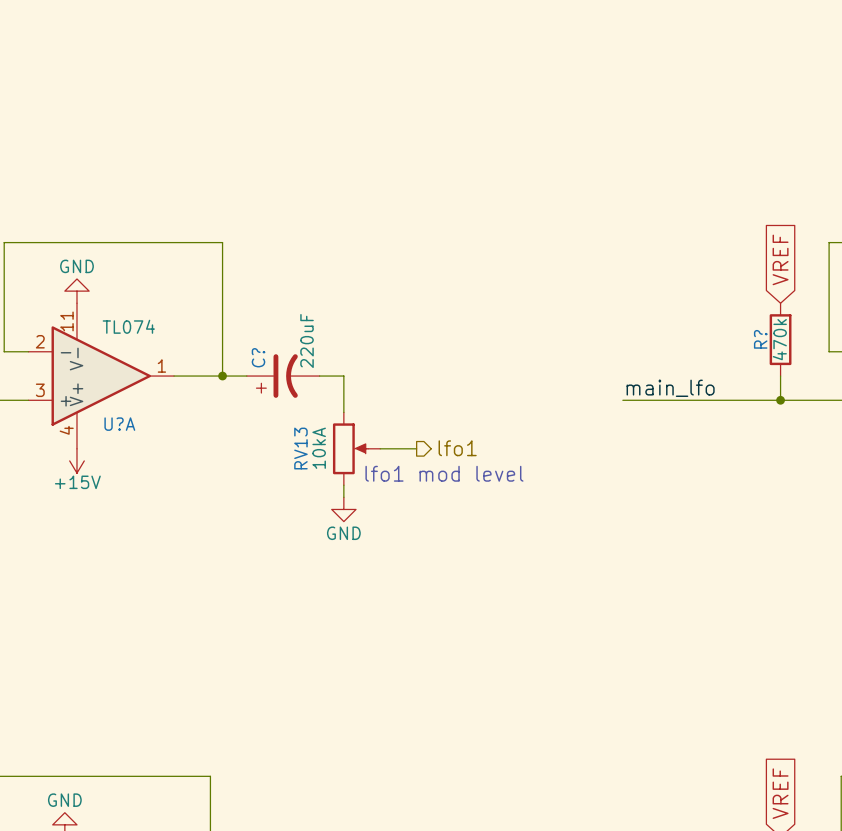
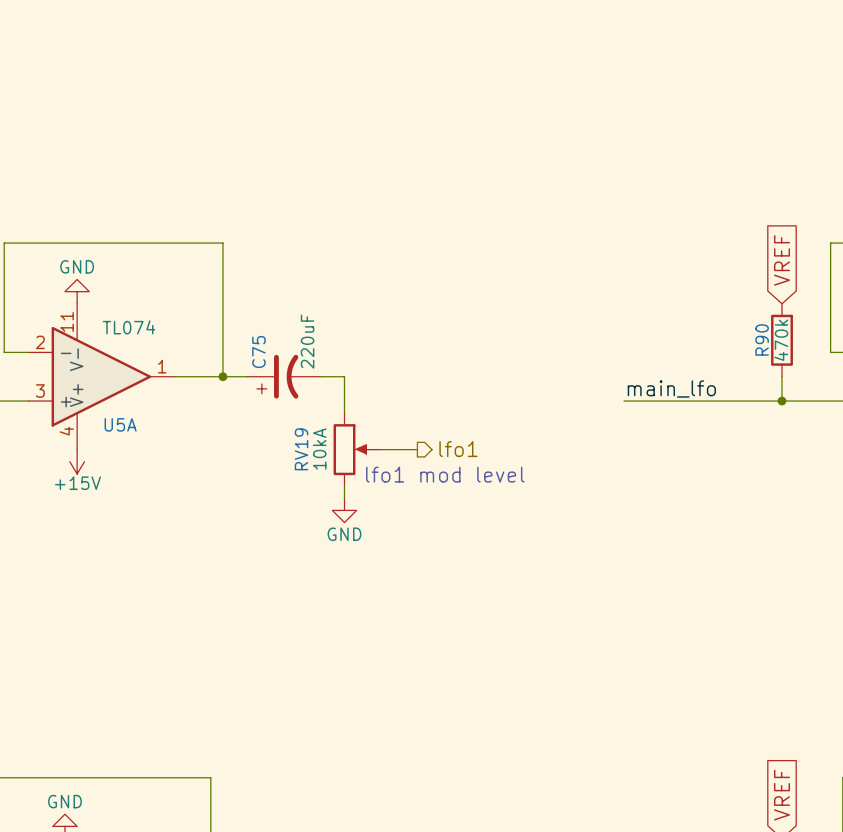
R? name: R? (760, 339) -> R90 (762, 339)
C? name: C? (258, 357) -> C75 (258, 352)
U?A name: U?A (119, 424) -> U5A (120, 424)
RV13 name: RV13 (300, 448) -> RV19 (301, 449)

